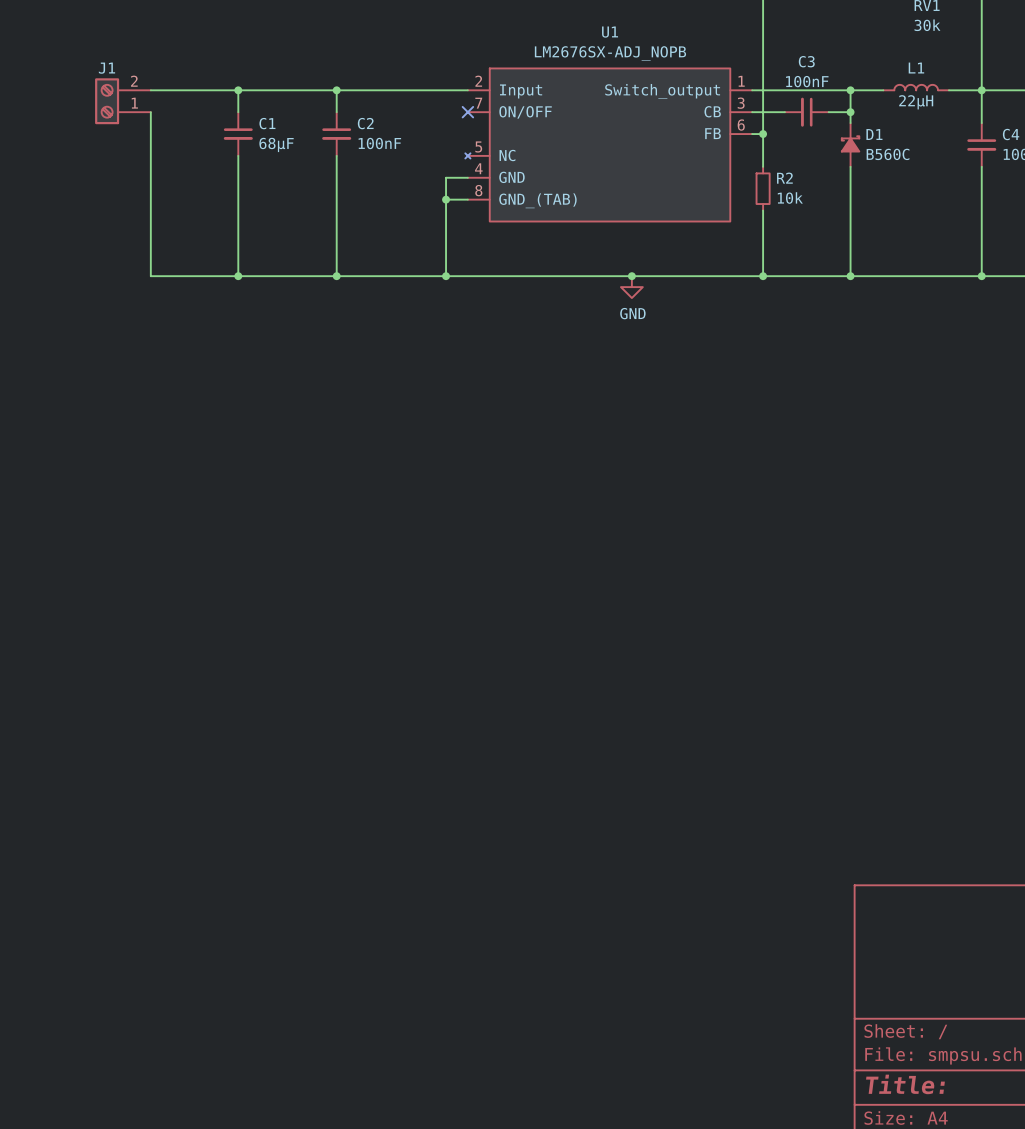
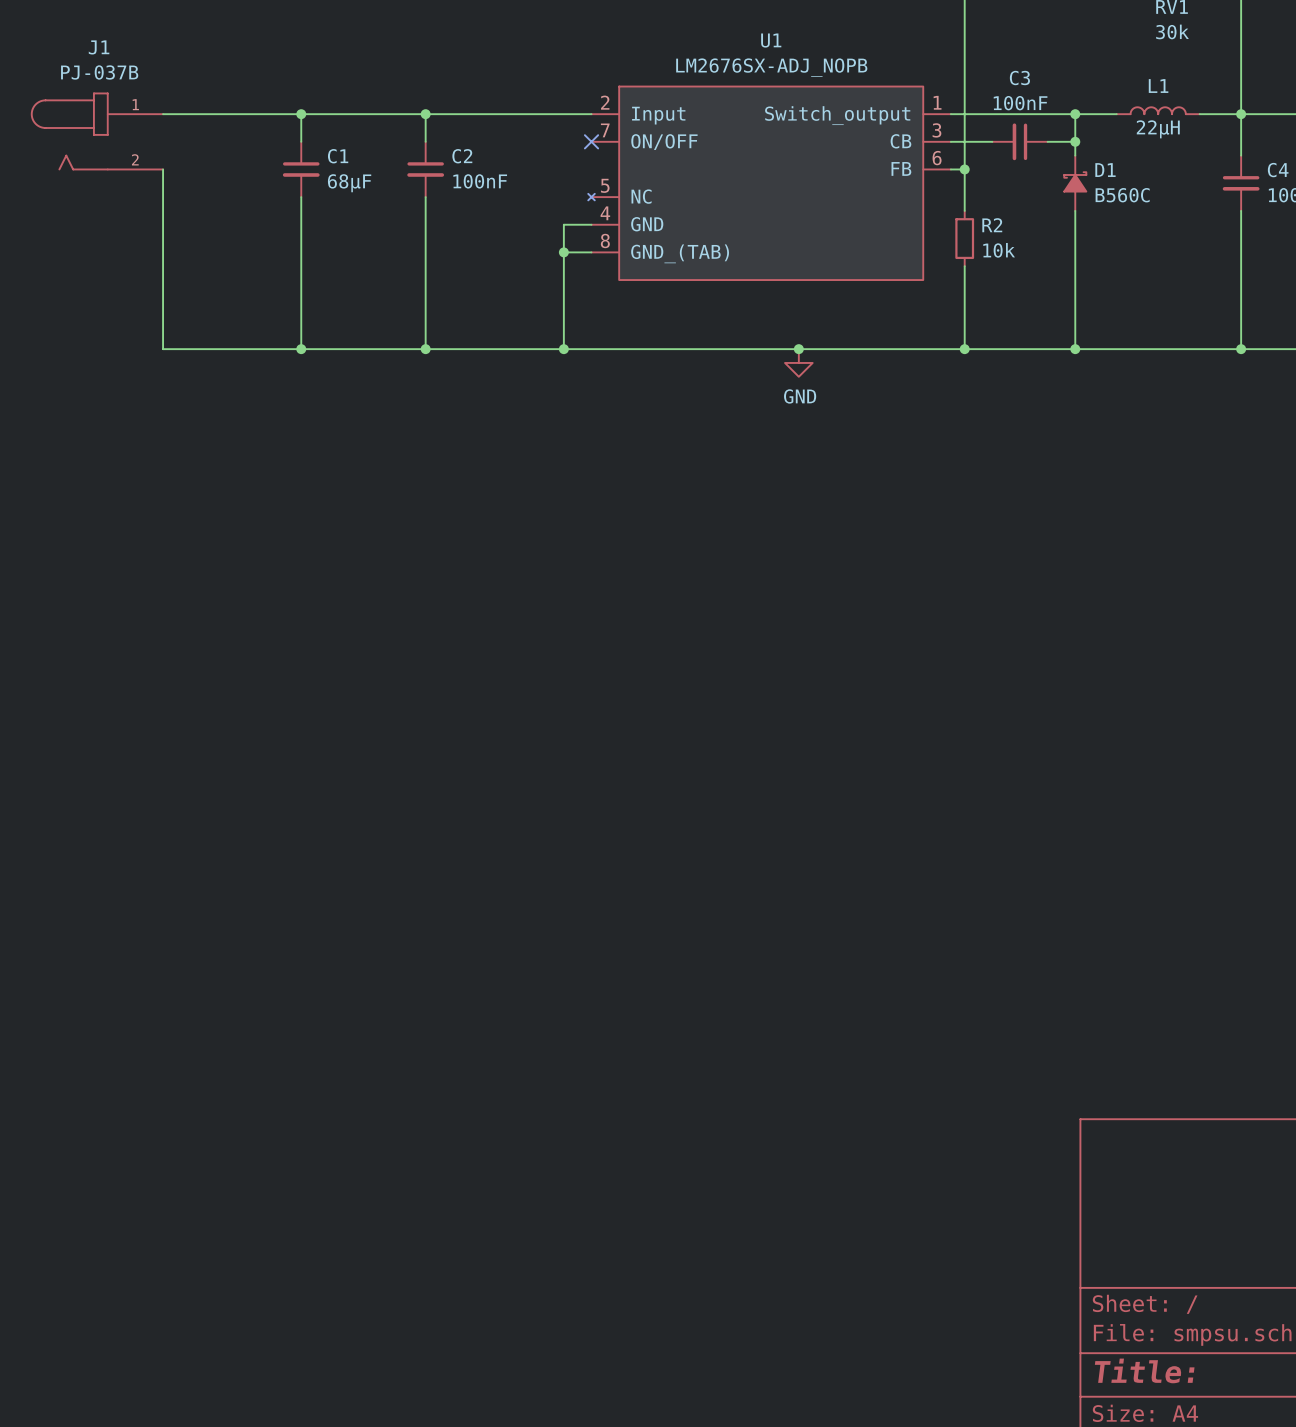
J1 value: none -> PJ-037B (99, 72)
J1 name position: J1 (106, 68) -> J1 (99, 47)
J1 symbol: [95, 78, 151, 125] -> [30, 92, 164, 171]
wire: (150, 112) (150, 276) -> (163, 169) (163, 349) (190, 349)

